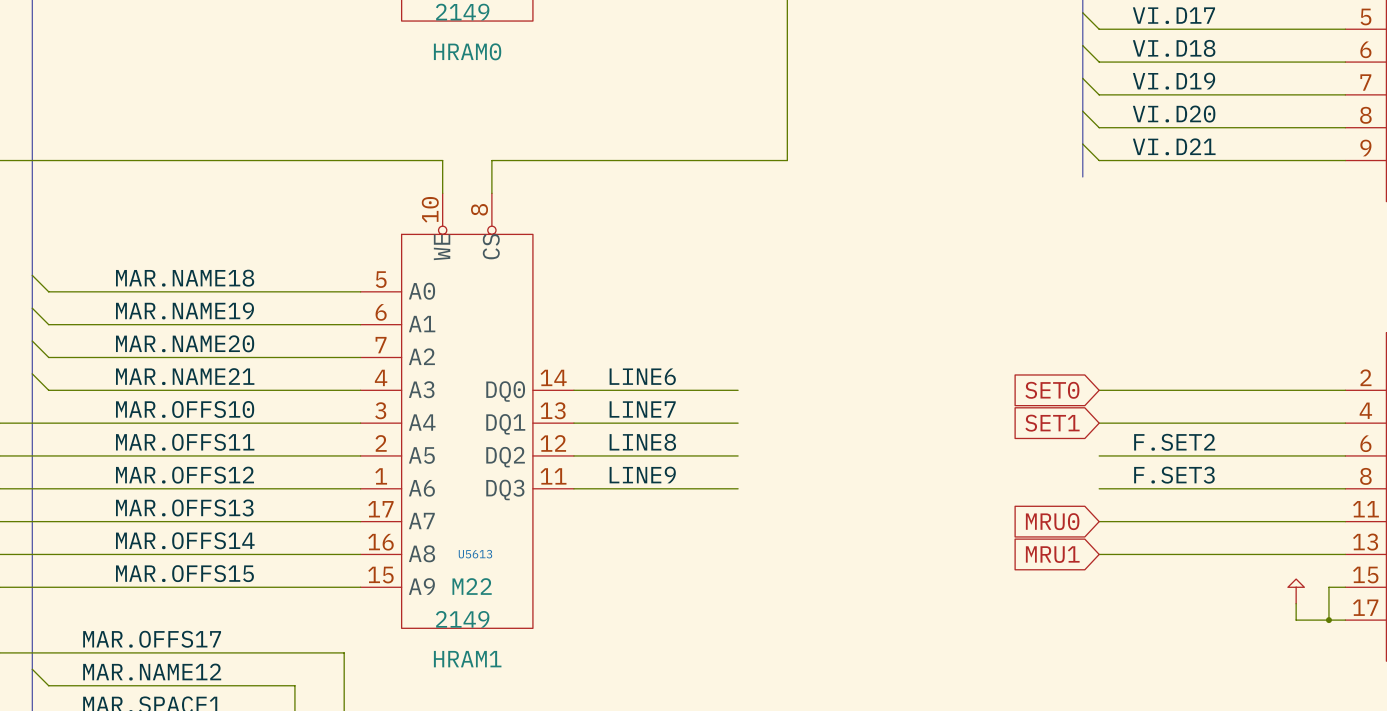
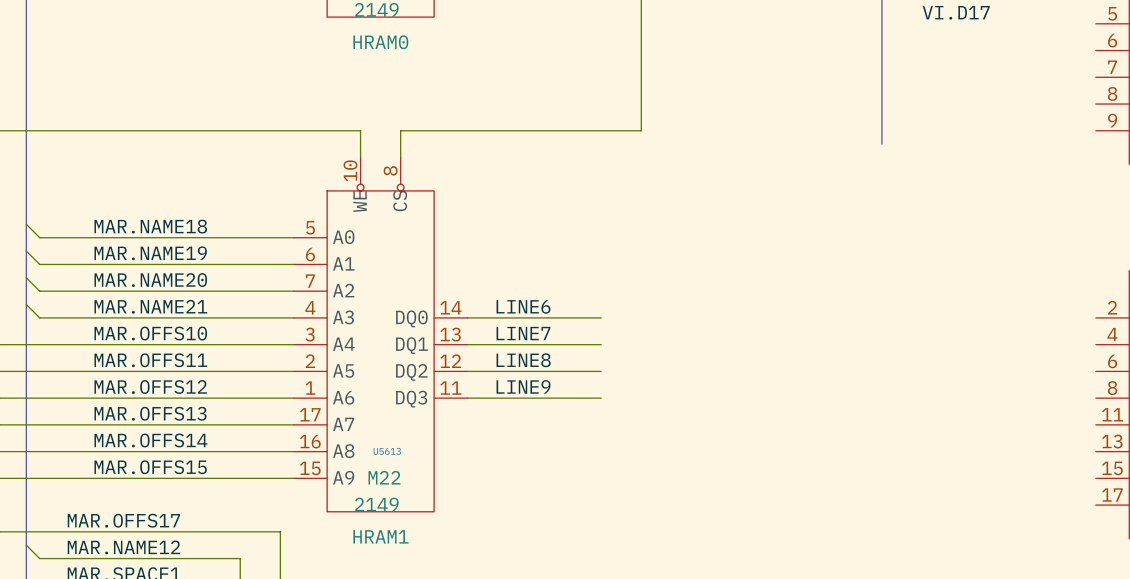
wire: (1082, 12) (1099, 29) (1345, 29) -> none
wire: (1082, 45) (1099, 62) (1345, 62) -> none
label: VI.D18 (1174, 48) -> none
wire: (1082, 78) (1099, 94) (1345, 94) -> none
label: VI.D19 (1174, 81) -> none
wire: (1082, 111) (1099, 127) (1345, 127) -> none
label: VI.D20 (1174, 114) -> none
wire: (1082, 144) (1099, 160) (1345, 160) -> none
label: VI.D21 (1174, 146) -> none
global label: SET0 (1052, 390) -> none
wire: (1099, 390) (1345, 390) -> none
global label: SET1 (1052, 423) -> none
wire: (1099, 423) (1345, 423) -> none
label: F.SET2 (1174, 442) -> none
wire: (1099, 455) (1345, 455) -> none
label: F.SET3 (1174, 475) -> none
wire: (1099, 488) (1345, 488) -> none
global label: MRU0 (1052, 521) -> none
wire: (1099, 521) (1345, 521) -> none
global label: MRU1 (1052, 554) -> none
wire: (1099, 554) (1345, 554) -> none
wire: (1345, 587) (1328, 587) (1328, 620) -> none
power symbol: (1296, 591) -> none
wire: (1296, 603) (1296, 620) (1345, 620) -> none
junction: (1328, 620) -> none

